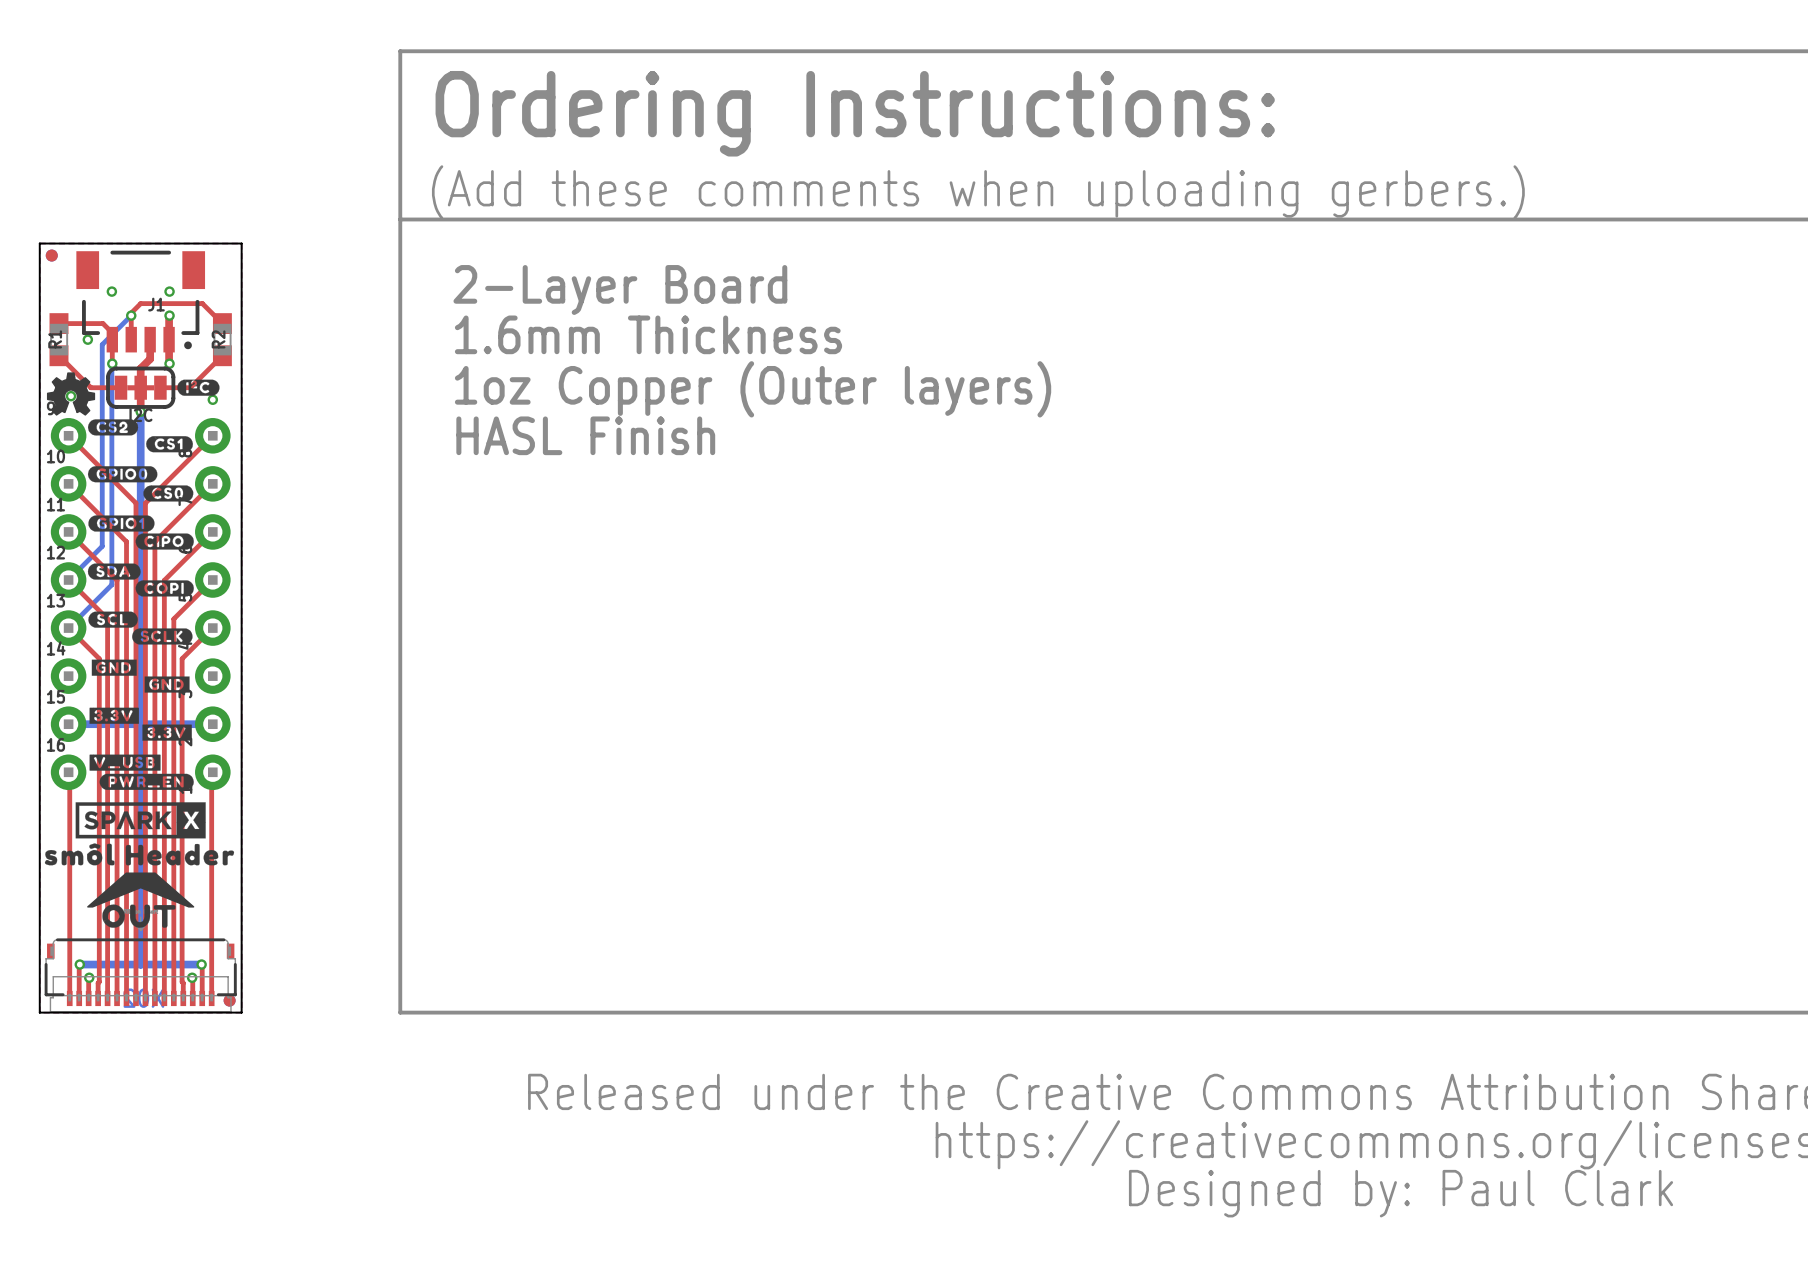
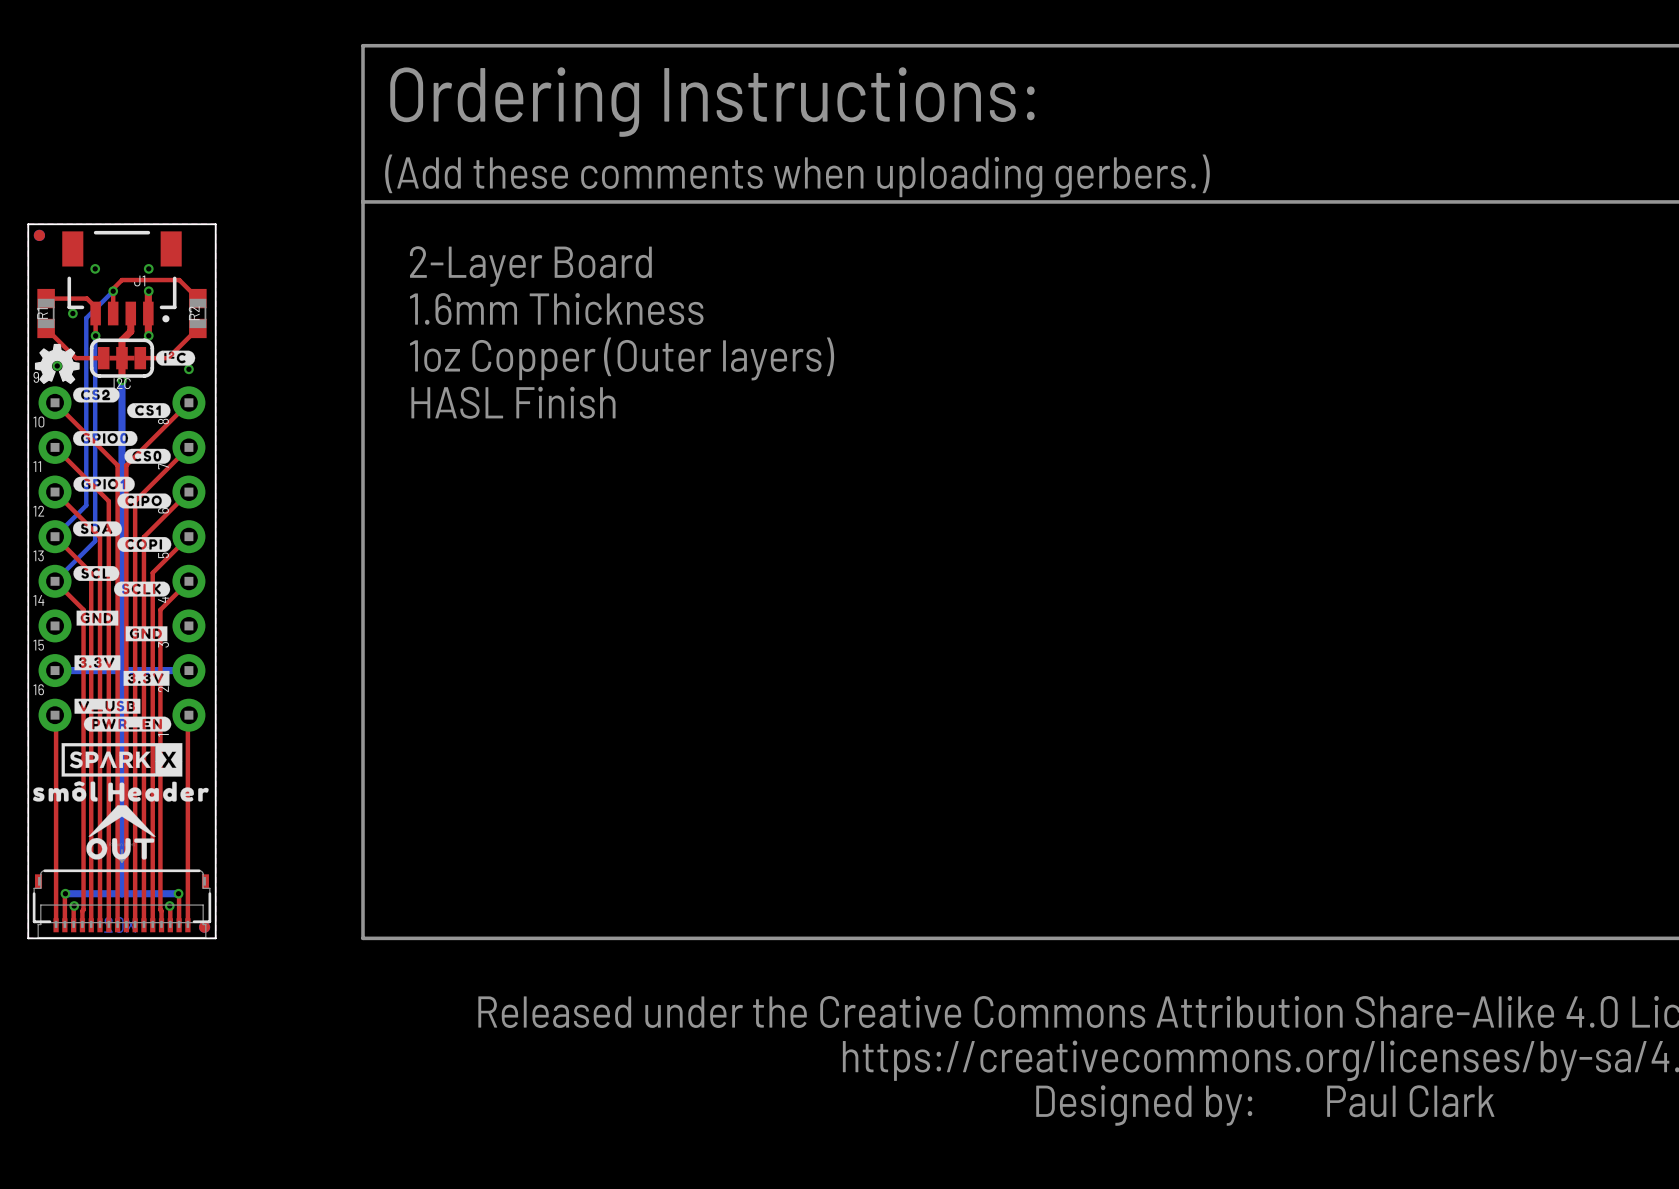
drawing shape: [87, 872, 195, 908] -> [88, 805, 156, 837]

